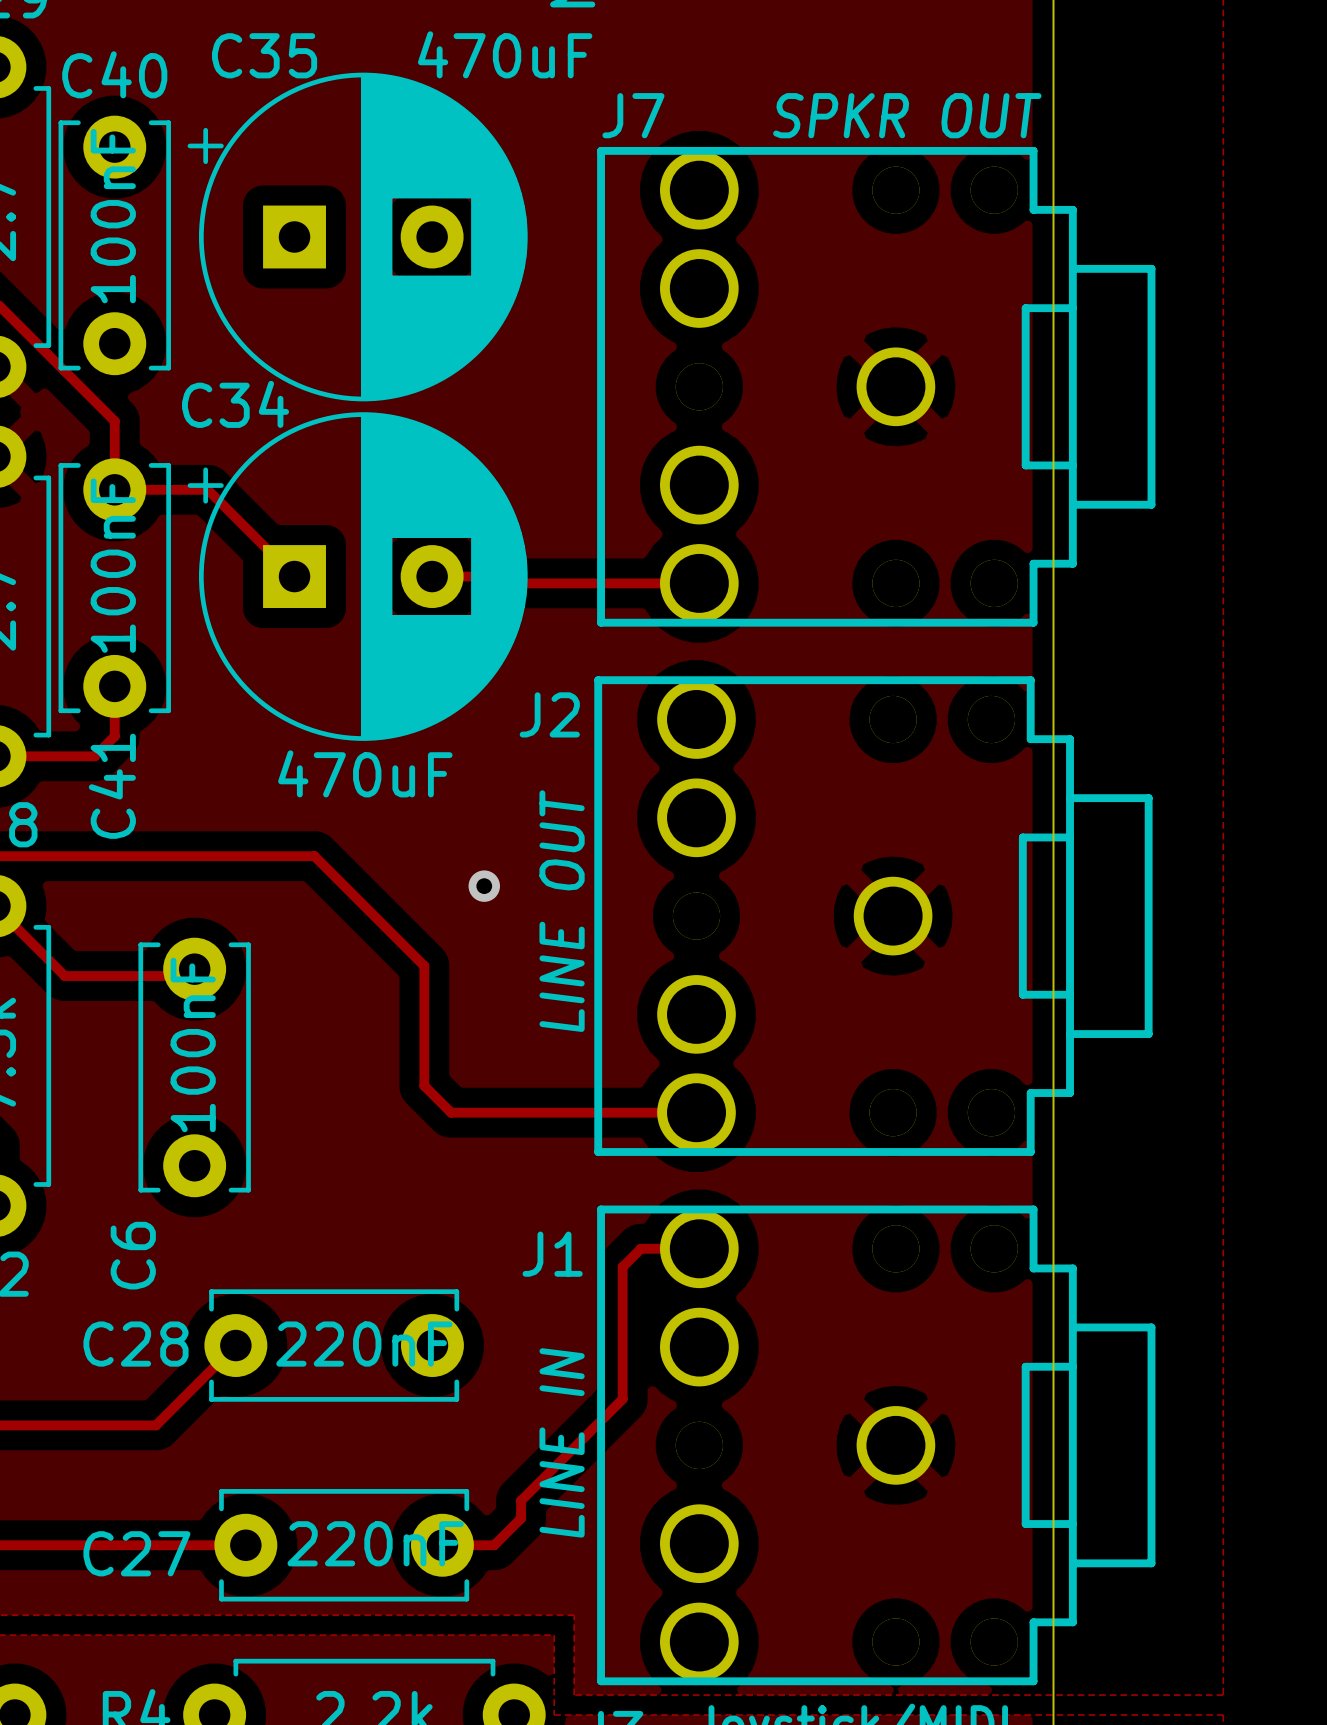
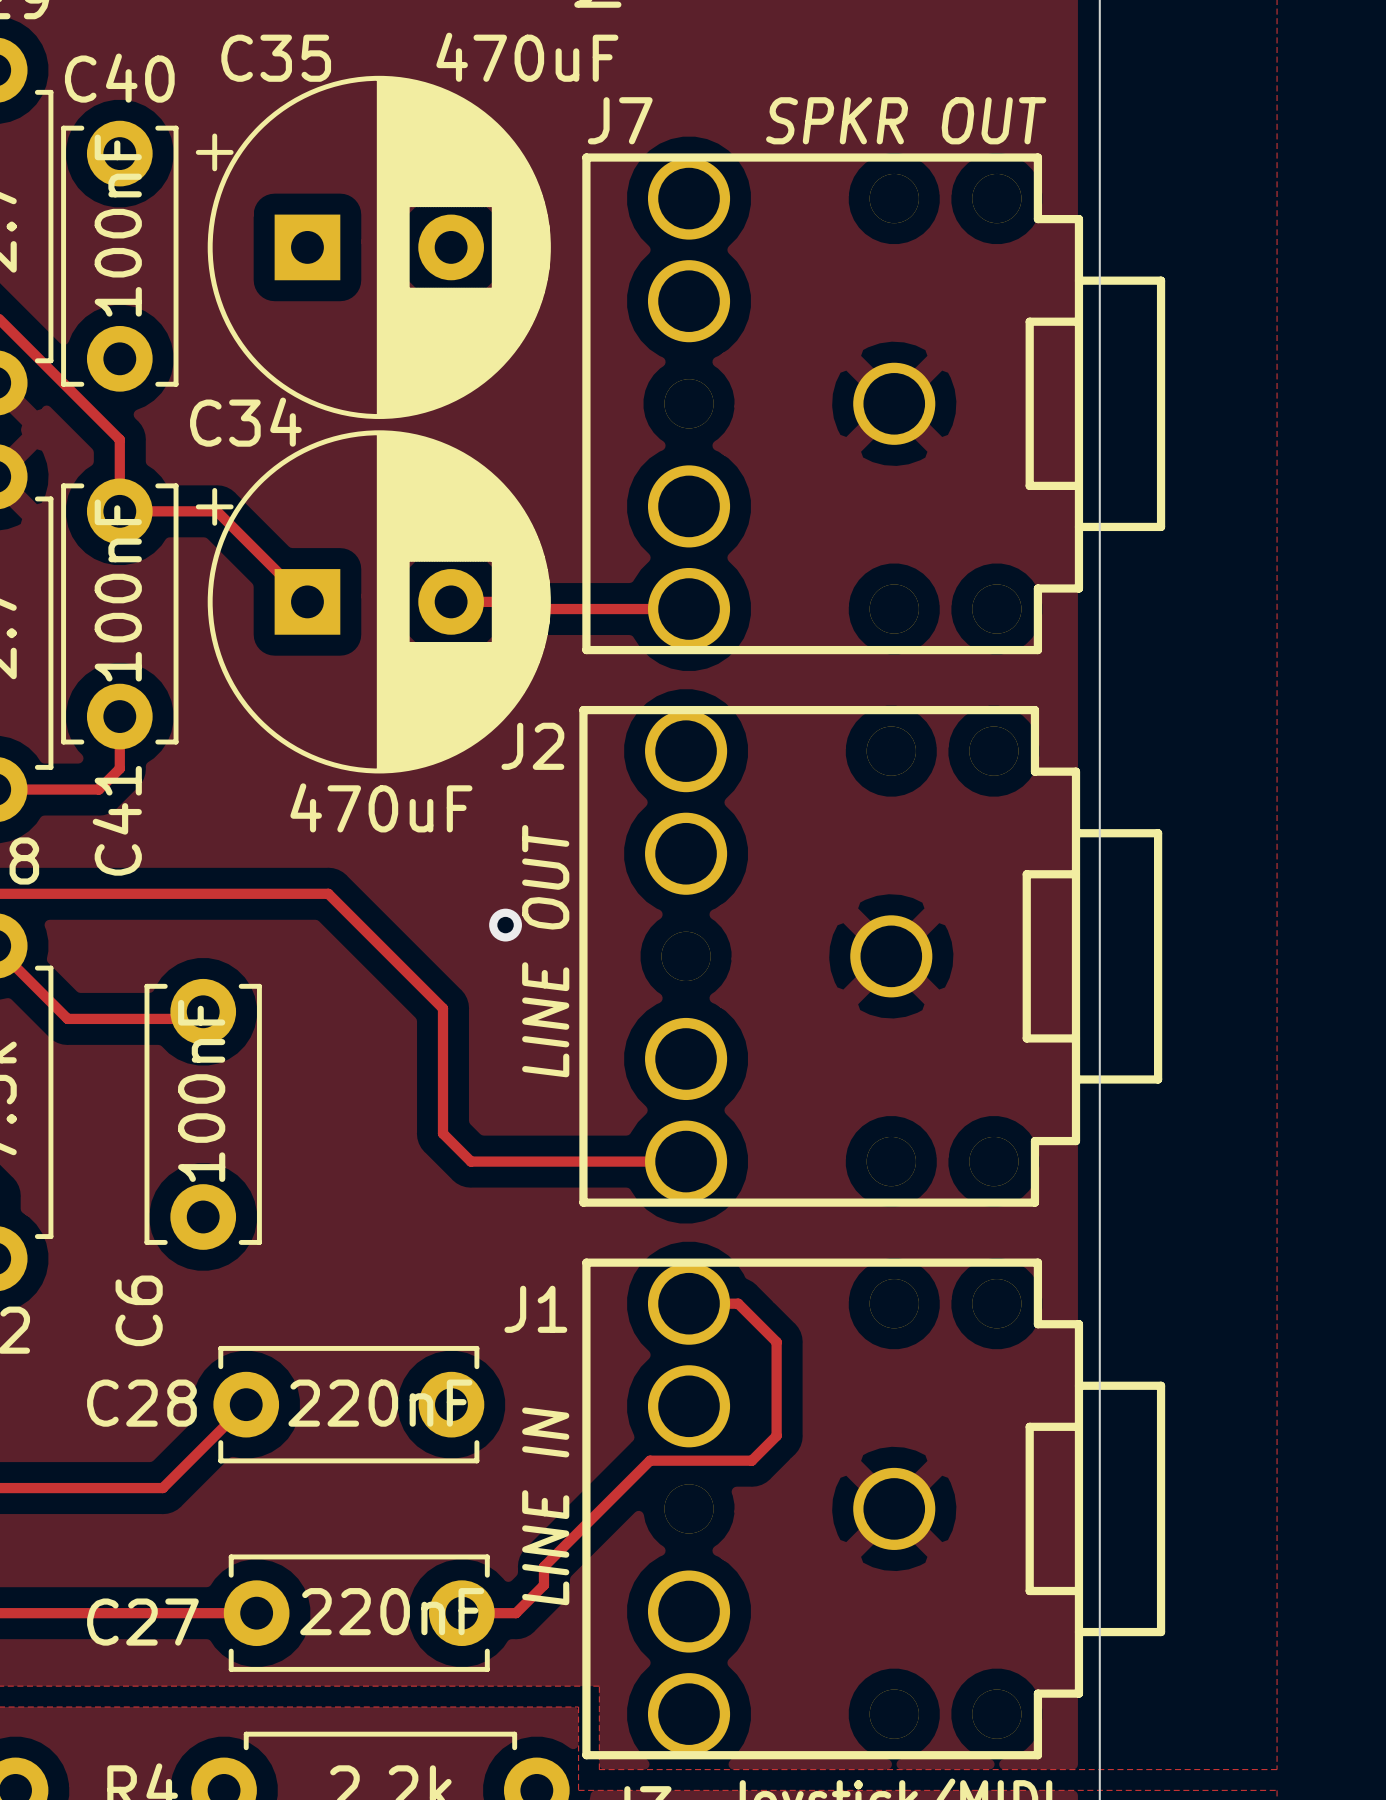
J7 position: (876, 386) -> (873, 403)
J2 position: (873, 916) -> (870, 956)
track: (660, 1248) (640, 1248) (622, 1267) (622, 1399) -> (738, 1303) (776, 1342) (776, 1435) (751, 1460) (650, 1460)
J1 position: (876, 1445) -> (873, 1508)

